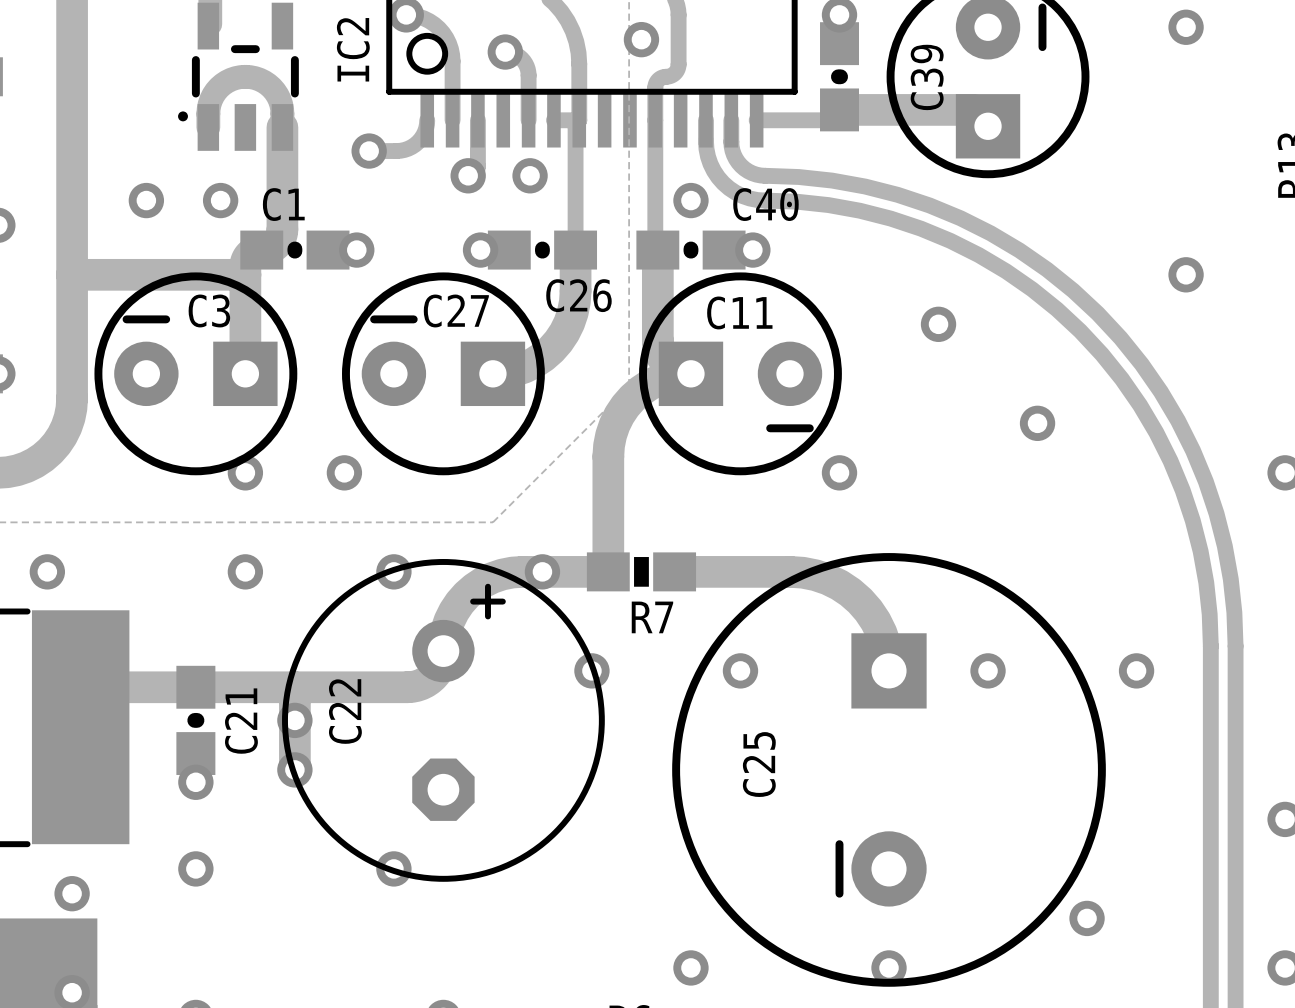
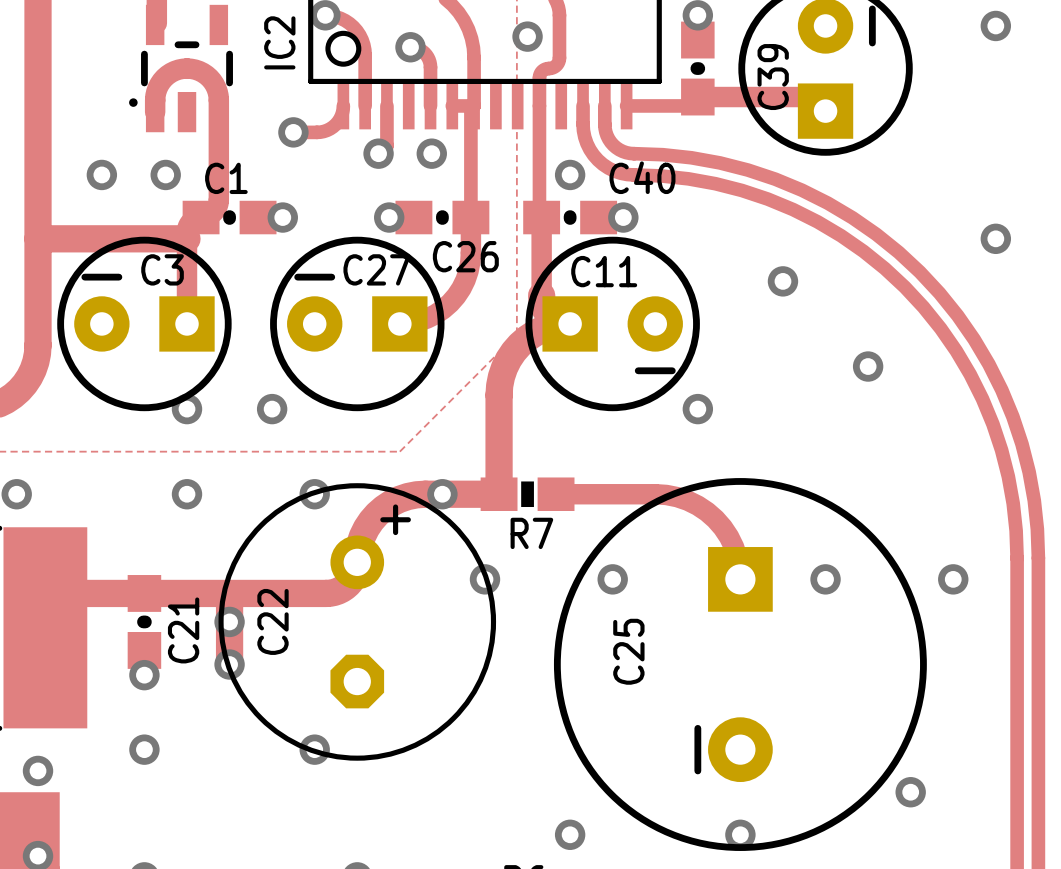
track width: thick (839, 109) (973, 110) (983, 114) (988, 126) -> thin (697, 97) (813, 97) (821, 101) (825, 111)
track width: thick (282, 127) (281, 234) (278, 241) (272, 247) (251, 253) (245, 264) (245, 373) -> thin (218, 112) (218, 204) (209, 215) (192, 220) (187, 229) (187, 323)
track width: thick (655, 247) (657, 250) (657, 340) -> thin (539, 215) (541, 217) (541, 295)
track width: thick (575, 250) (574, 301) (564, 332) (551, 349) (534, 362) (514, 371) (492, 373) -> thin (470, 217) (470, 262) (461, 288) (450, 303) (435, 314) (418, 321) (399, 323)
track width: thick (674, 571) (789, 571) (815, 575) (827, 579) (850, 592) (868, 610) (881, 633) (885, 645) (889, 670) -> thin (556, 494) (655, 494) (687, 500) (707, 511) (722, 527) (737, 557) (740, 579)

